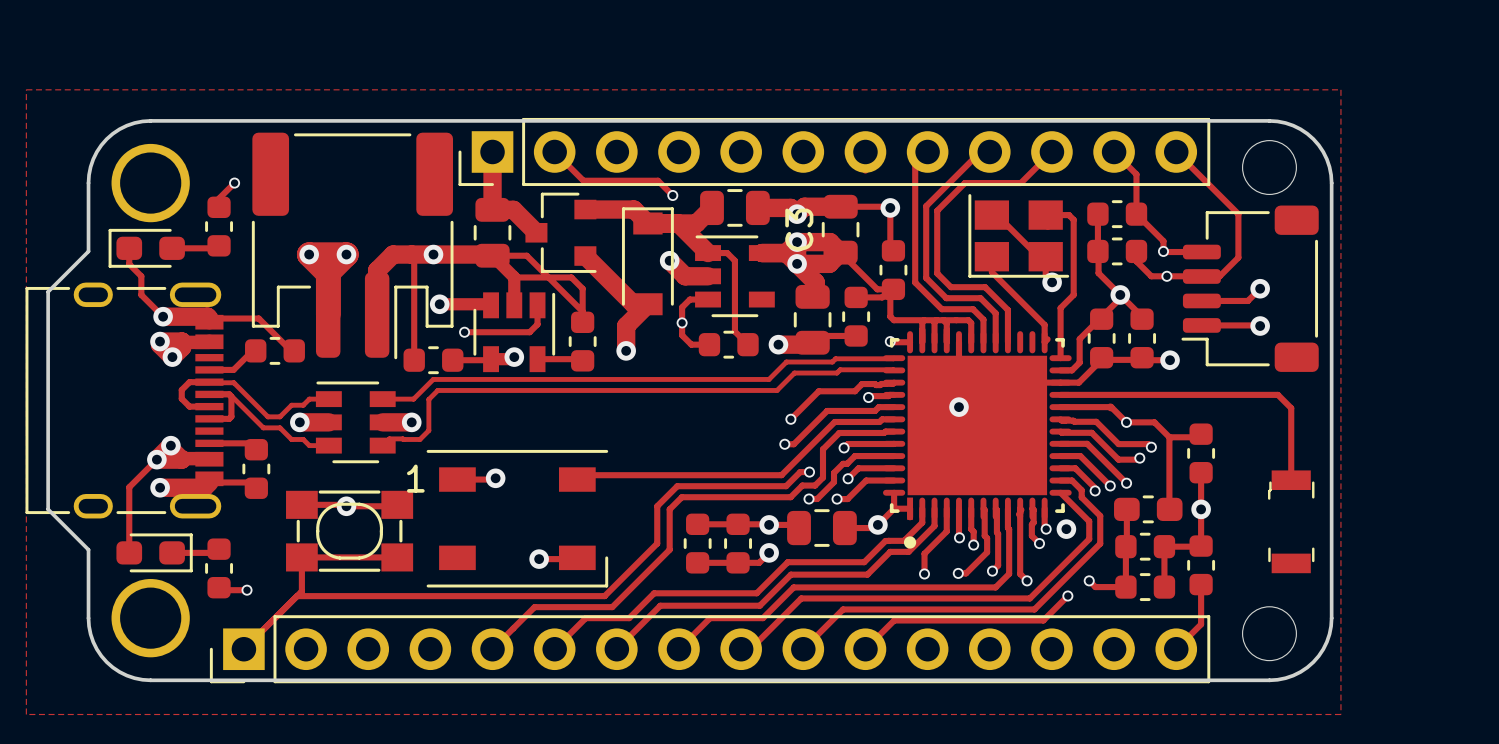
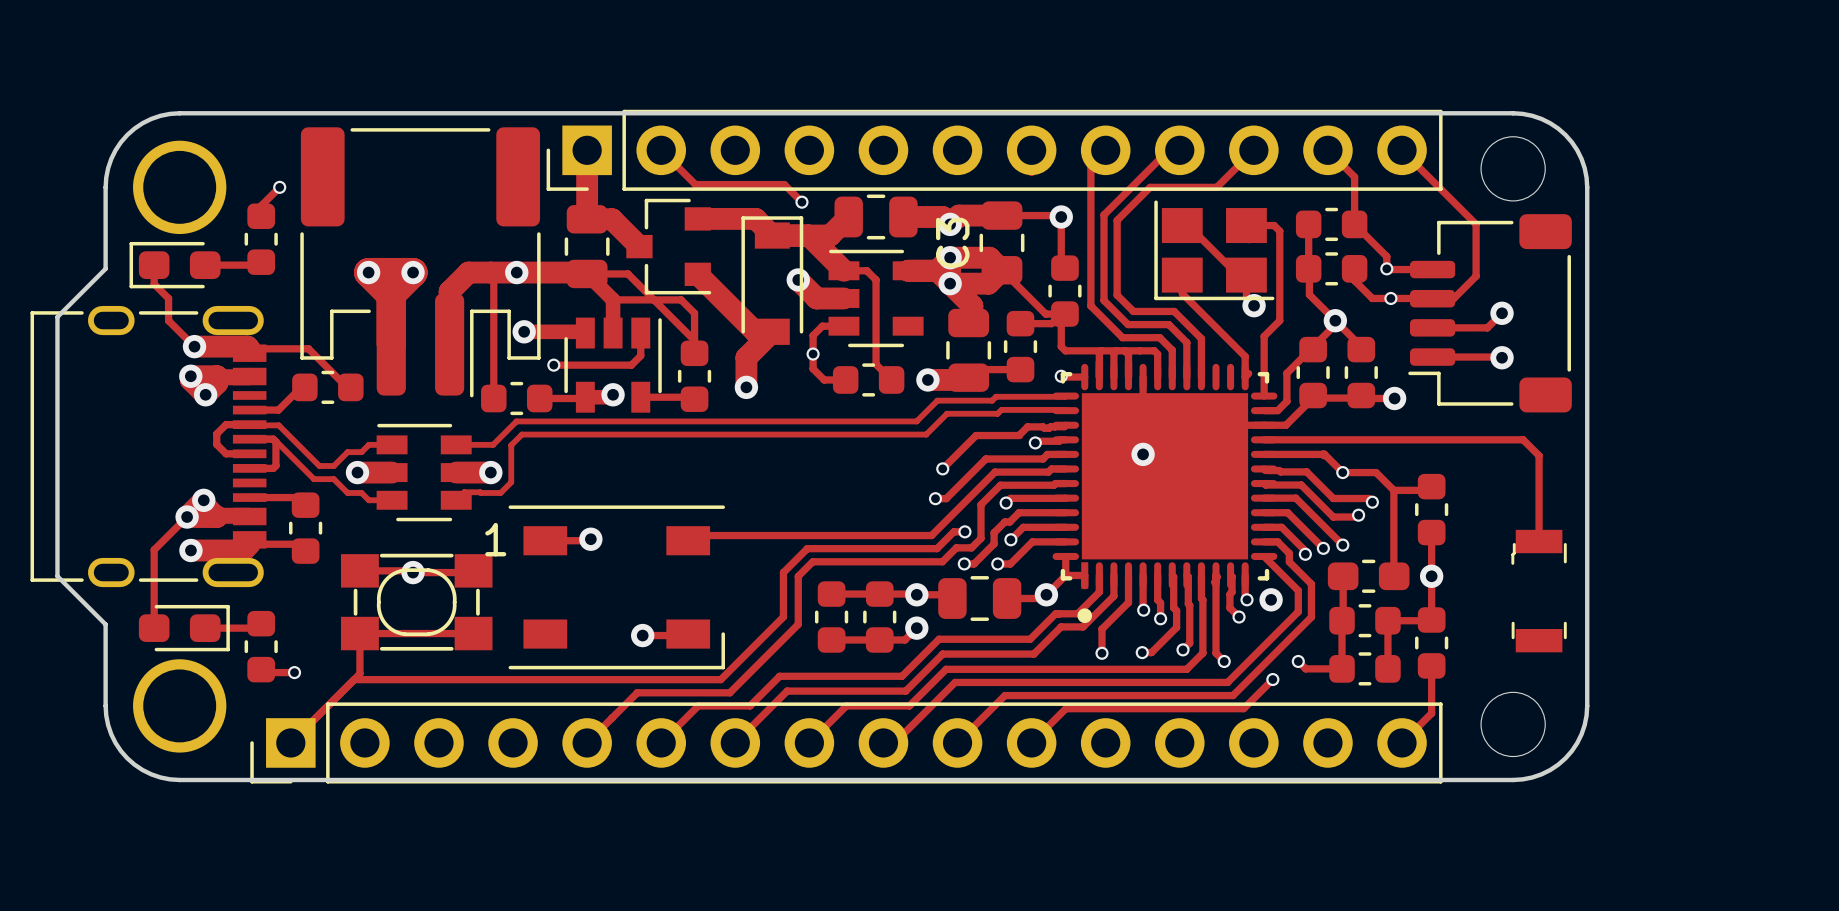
zone outline: (26, 89) (26, 714) (1340, 714) (1340, 89) (26, 89) -> none

